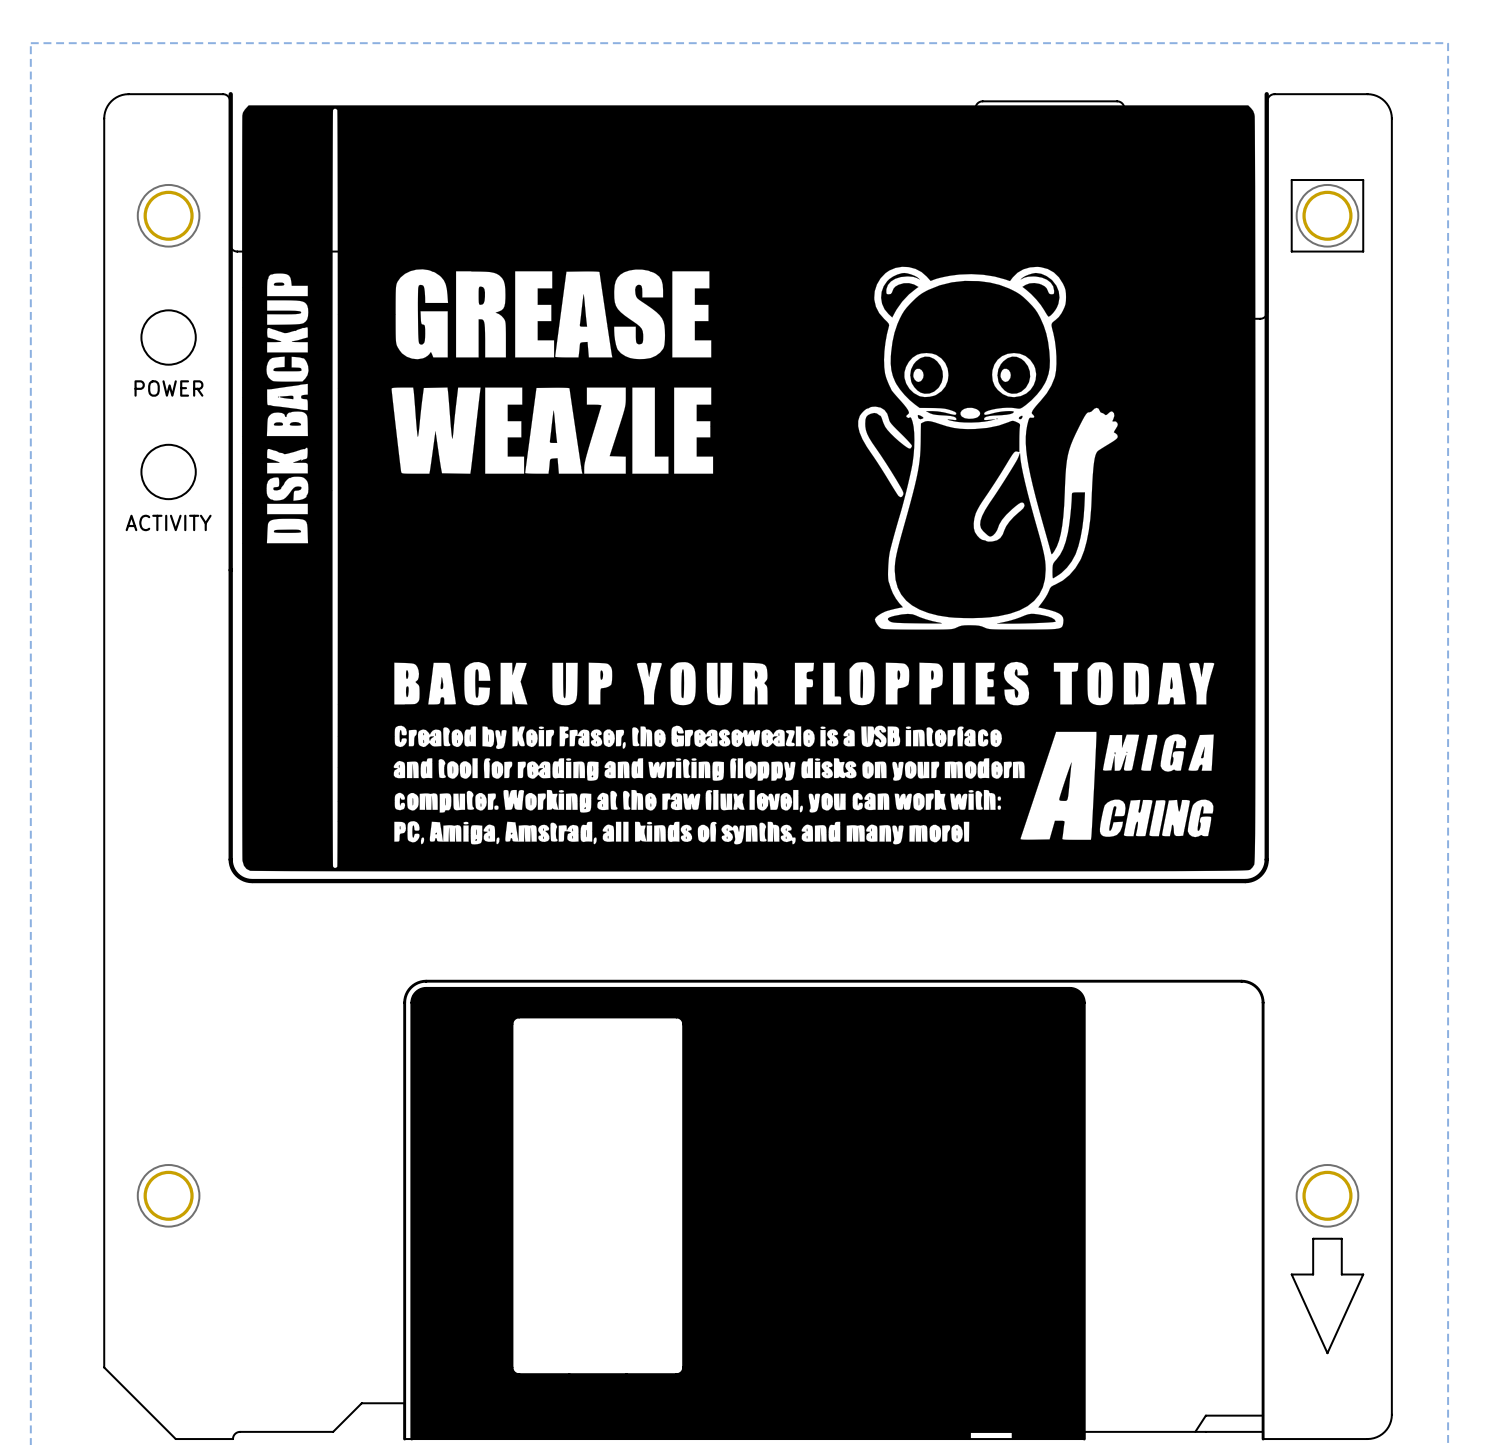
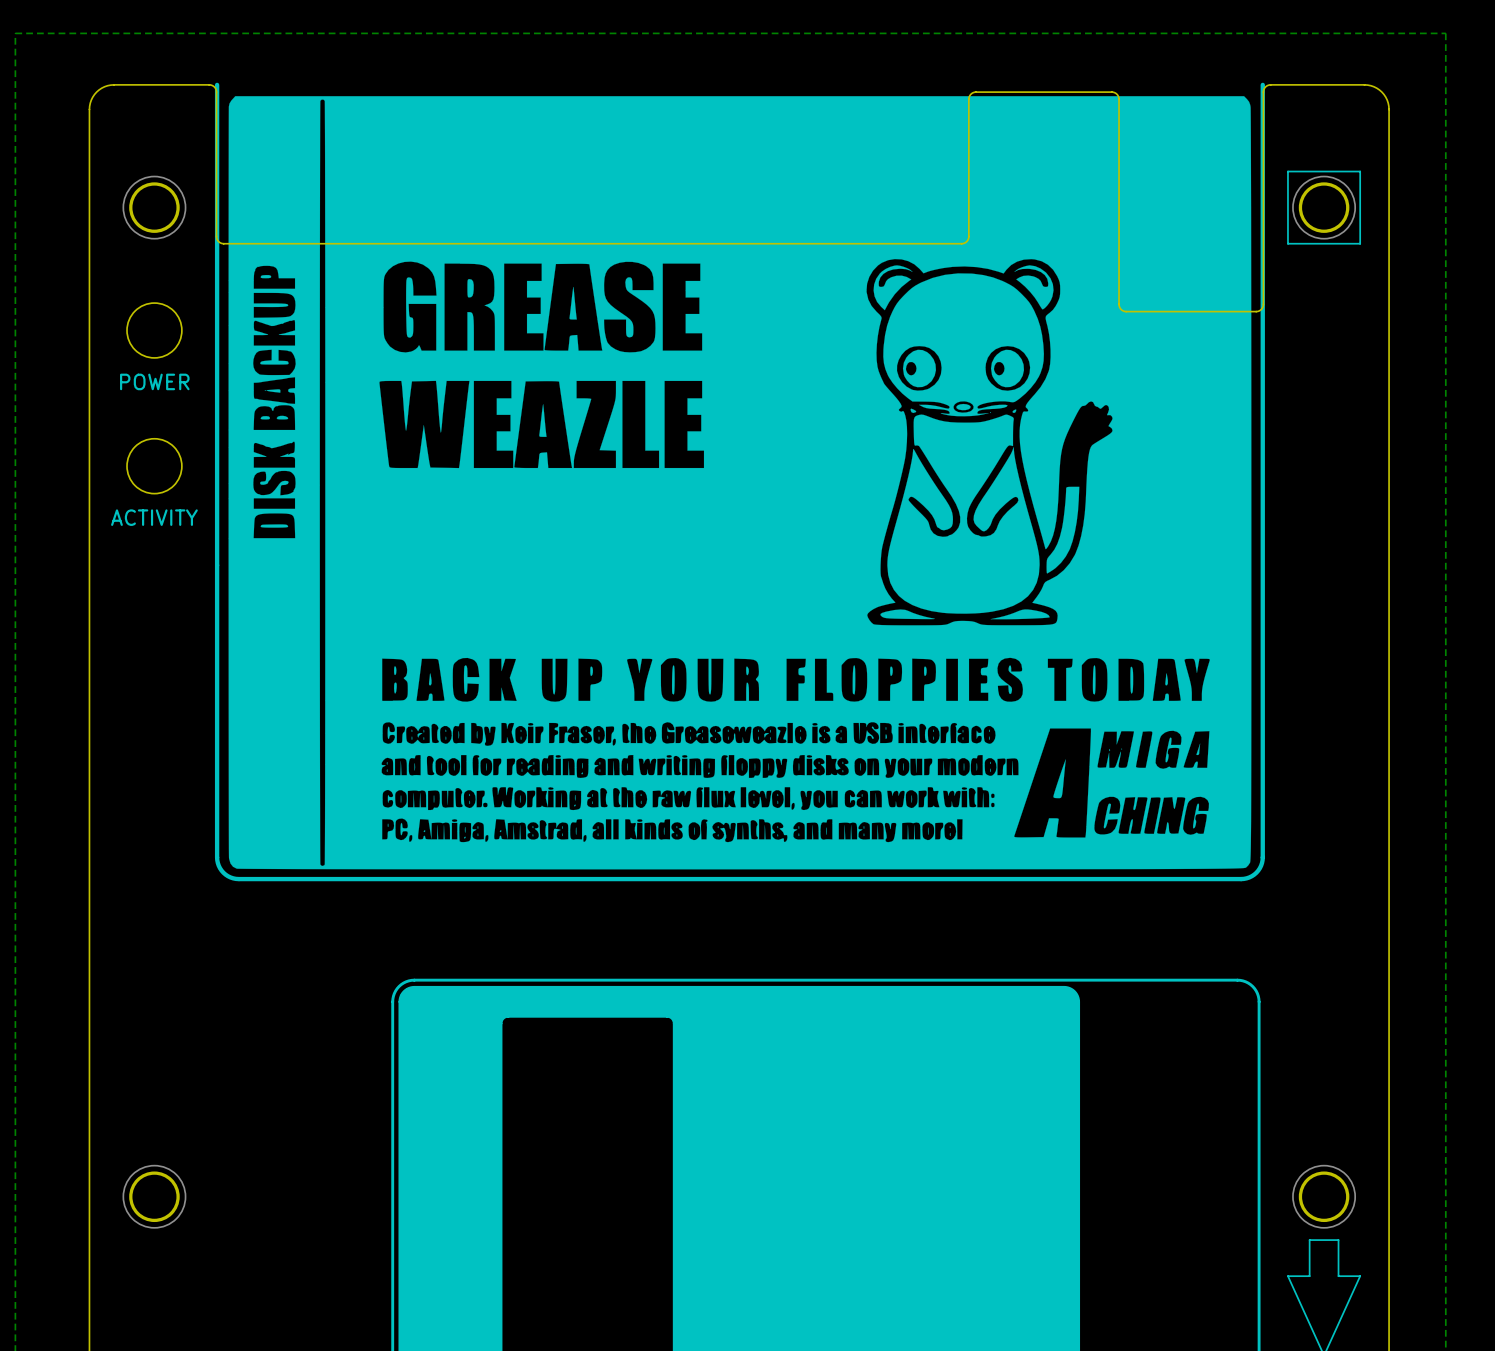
drawing shape: [241, 105, 1256, 872] -> [228, 96, 1252, 870]

